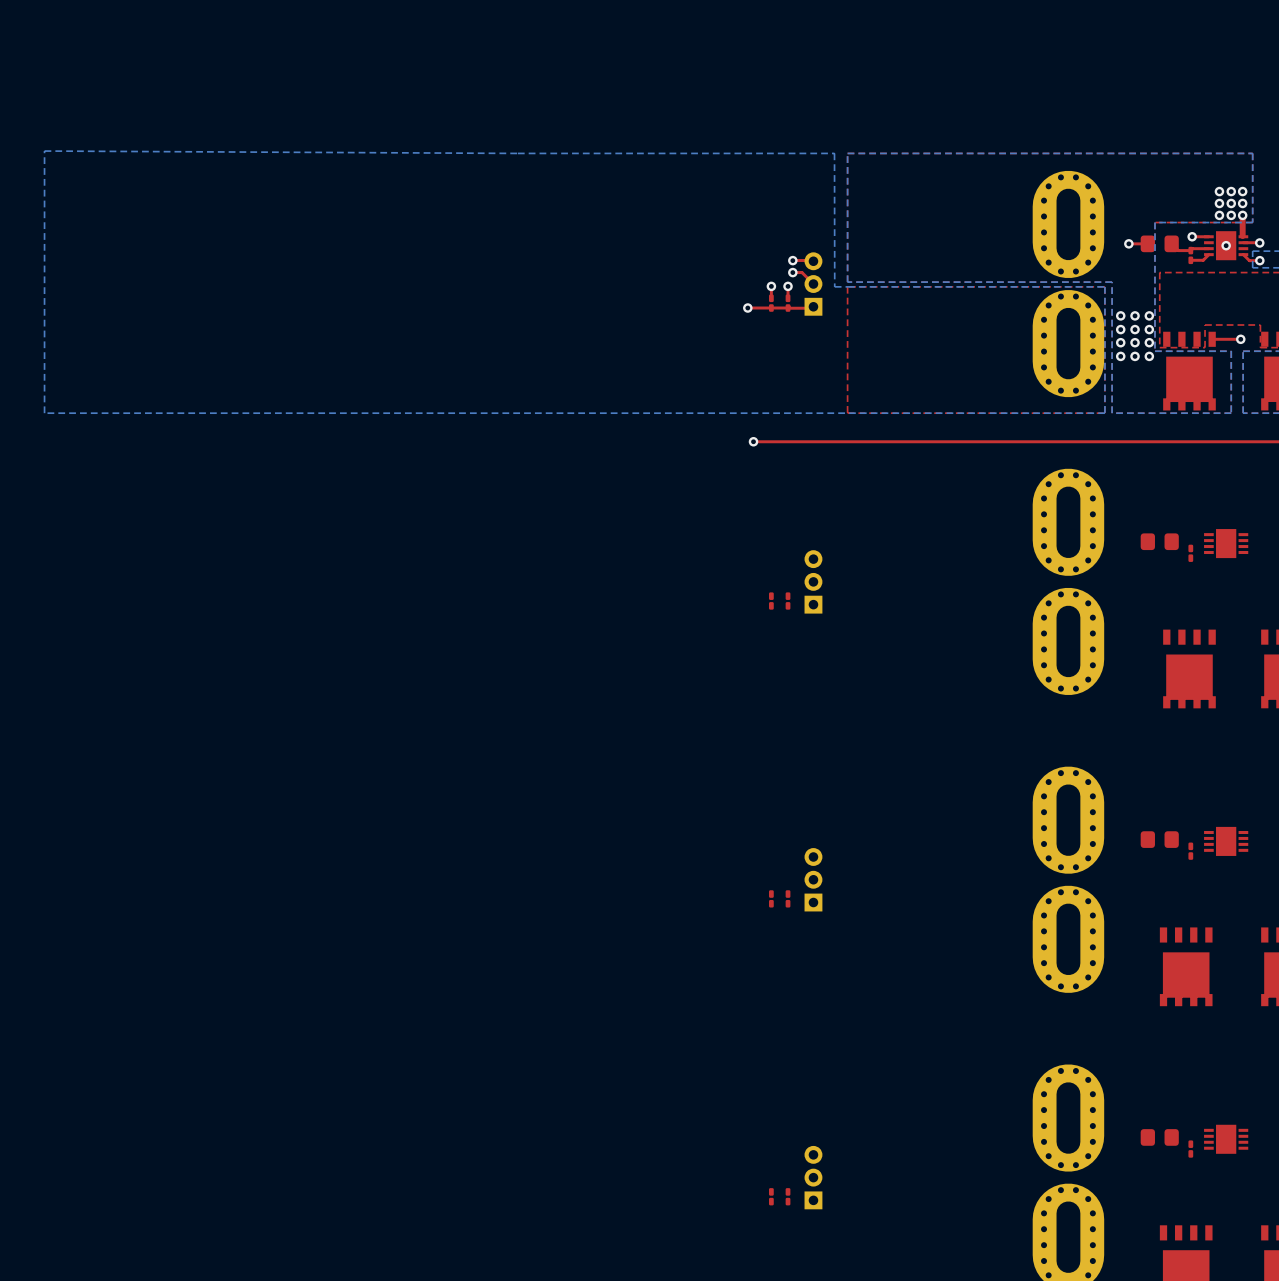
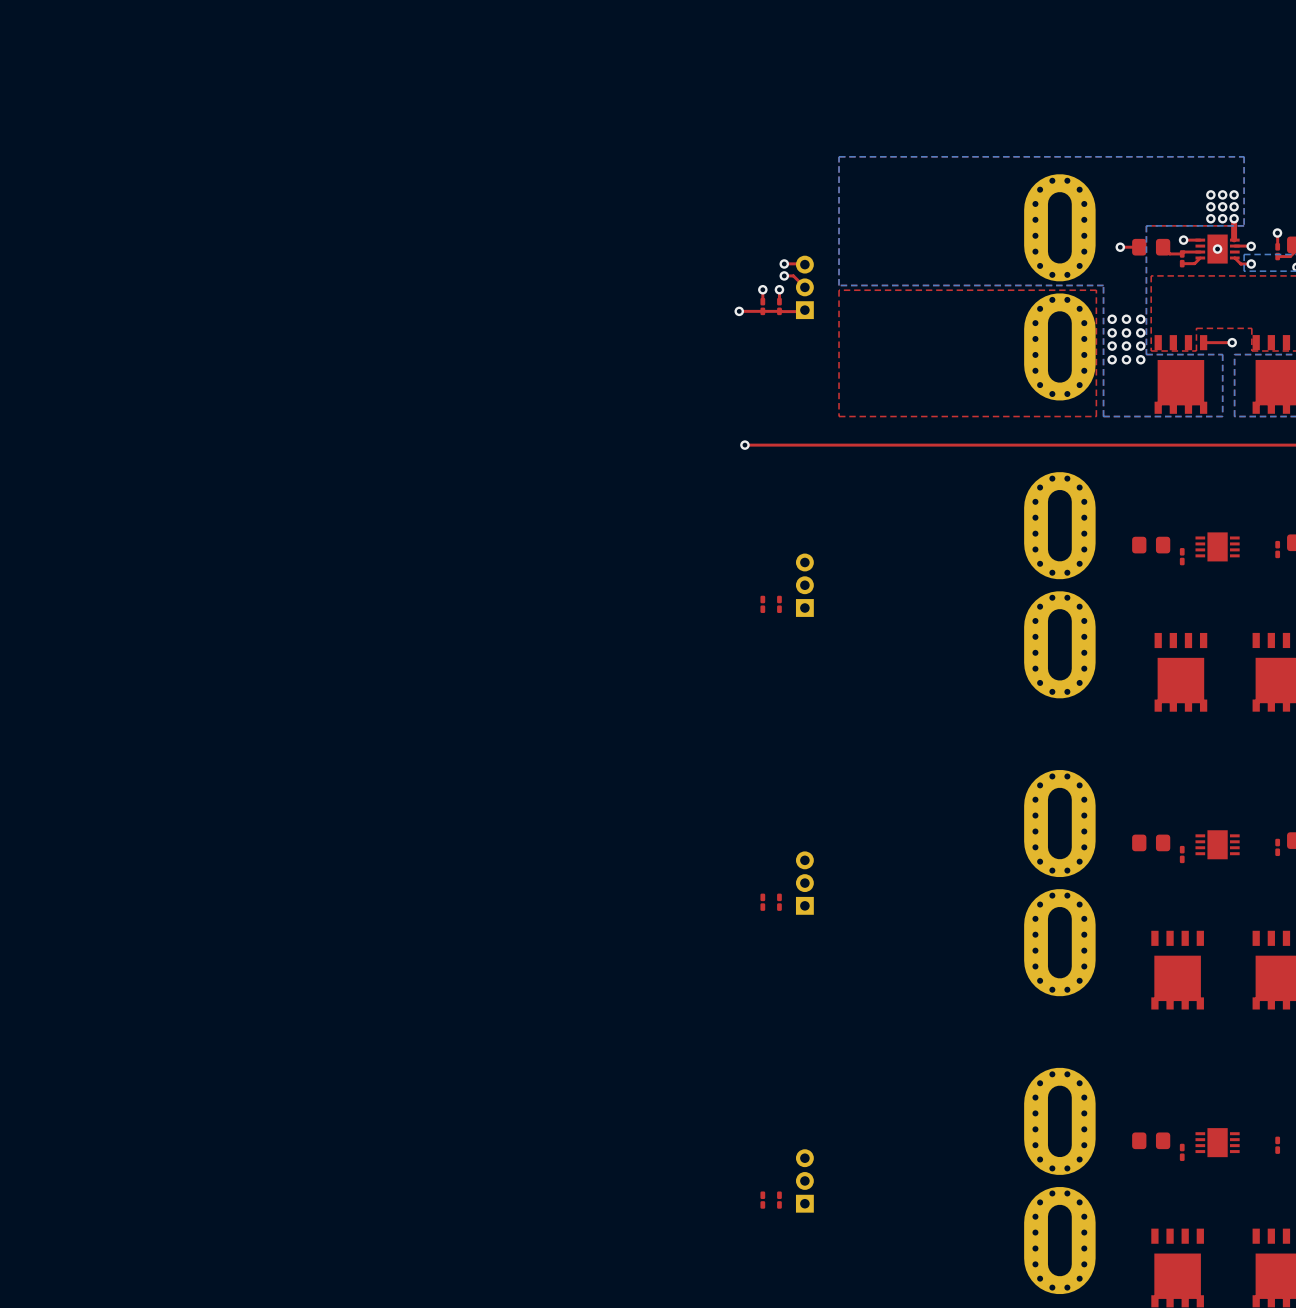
bottom zone outline: (44, 151) (44, 413) (1104, 413) (1104, 286) (834, 286) (834, 153) (44, 151) -> none

